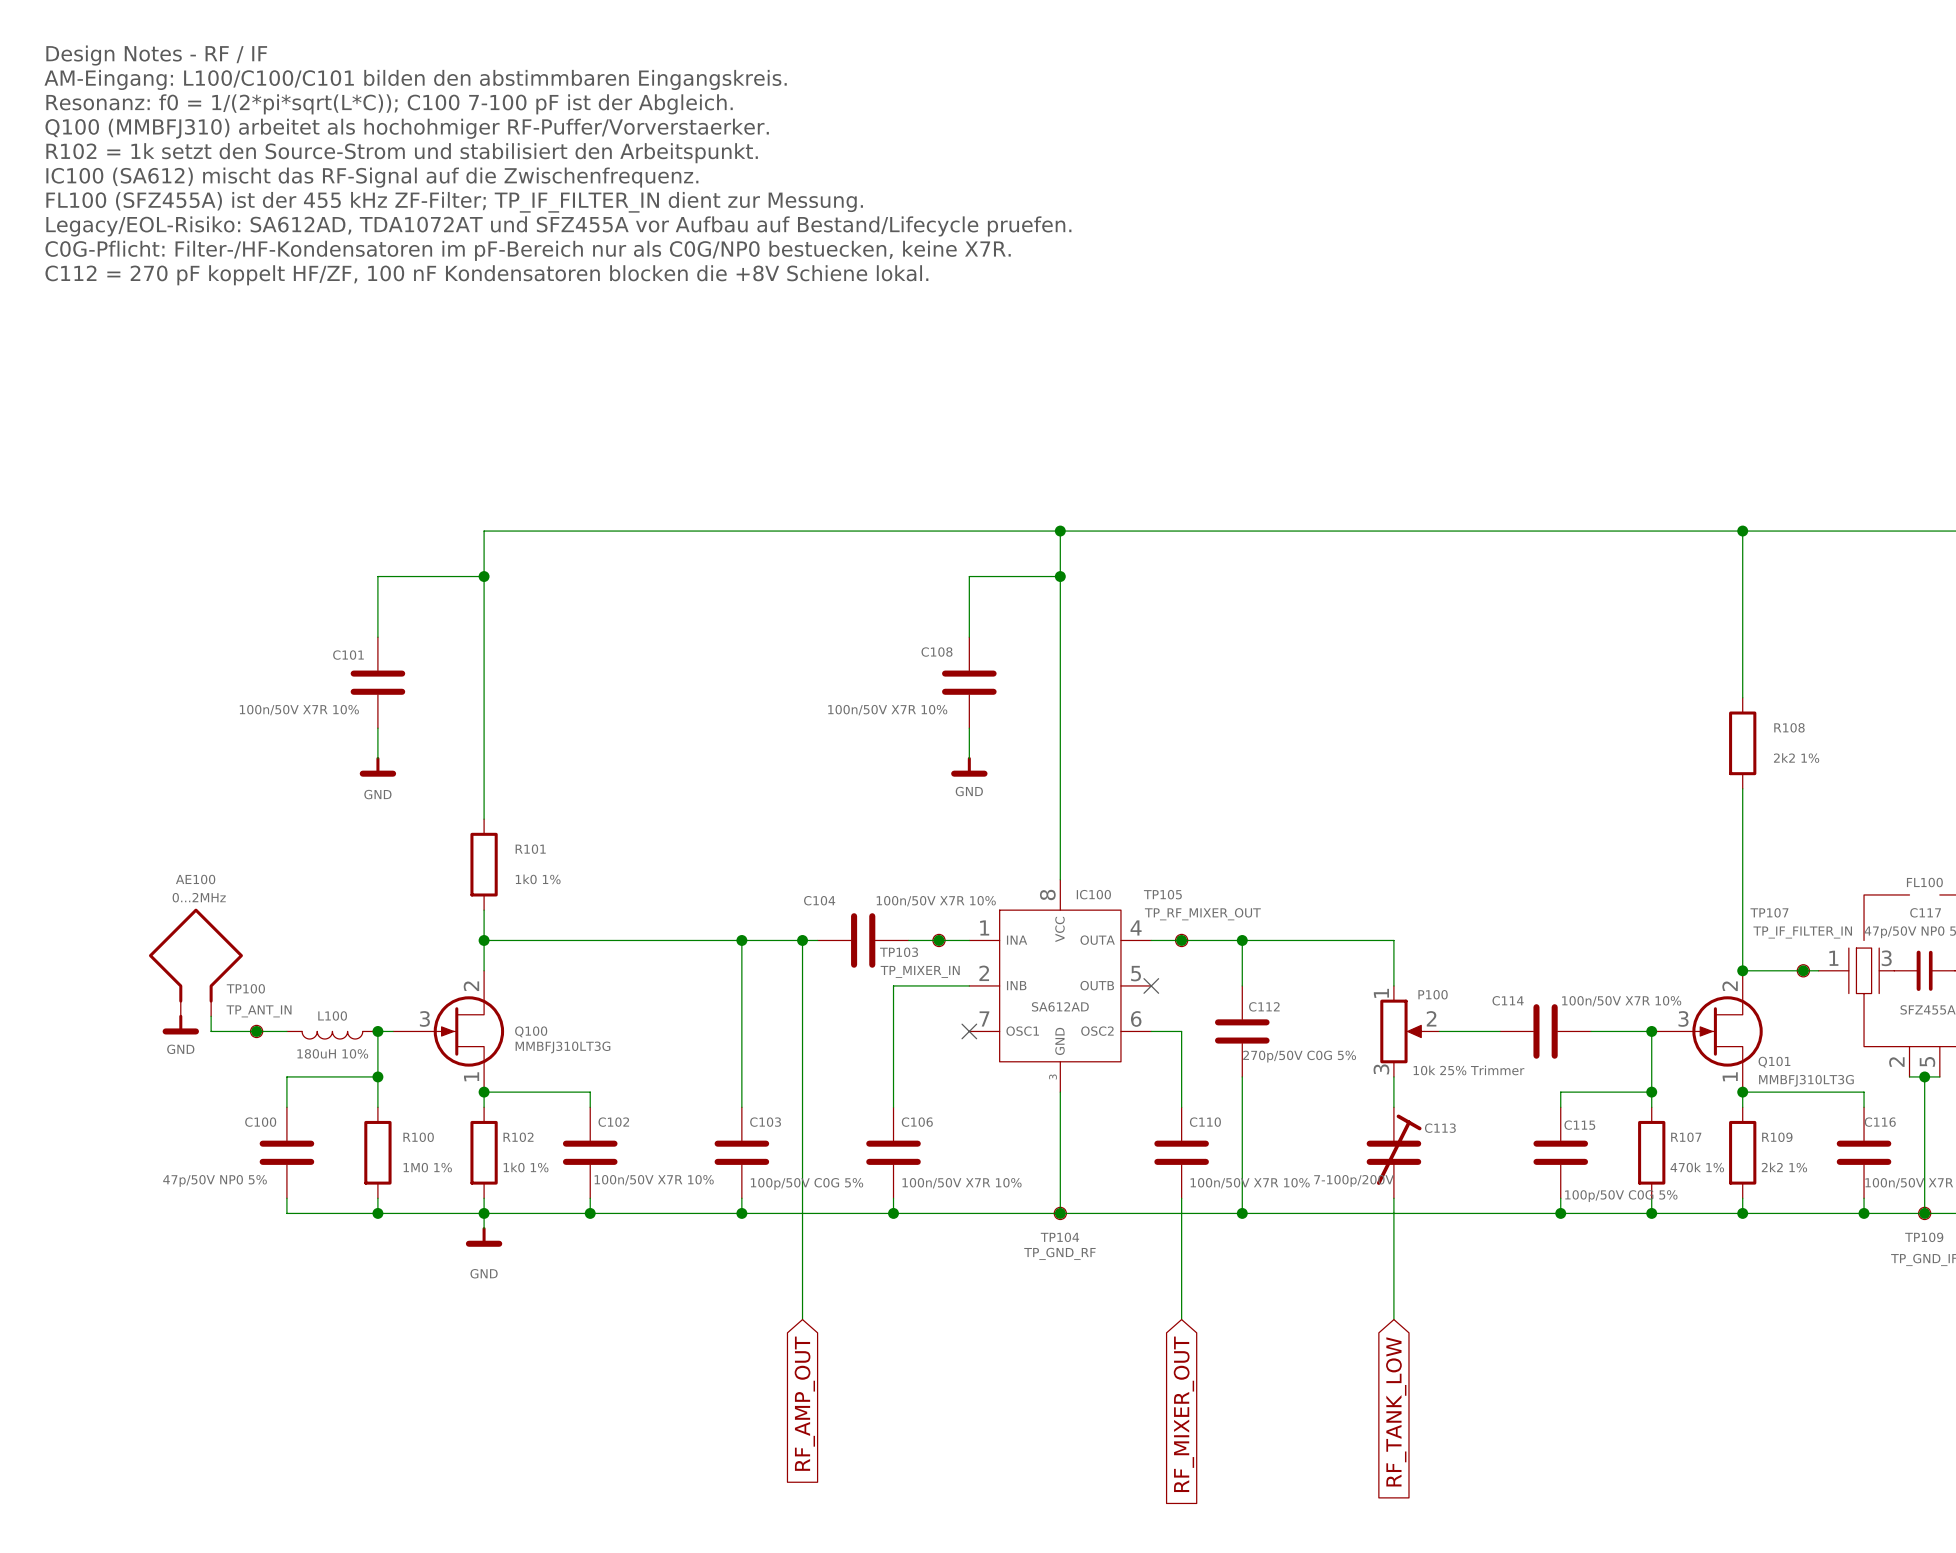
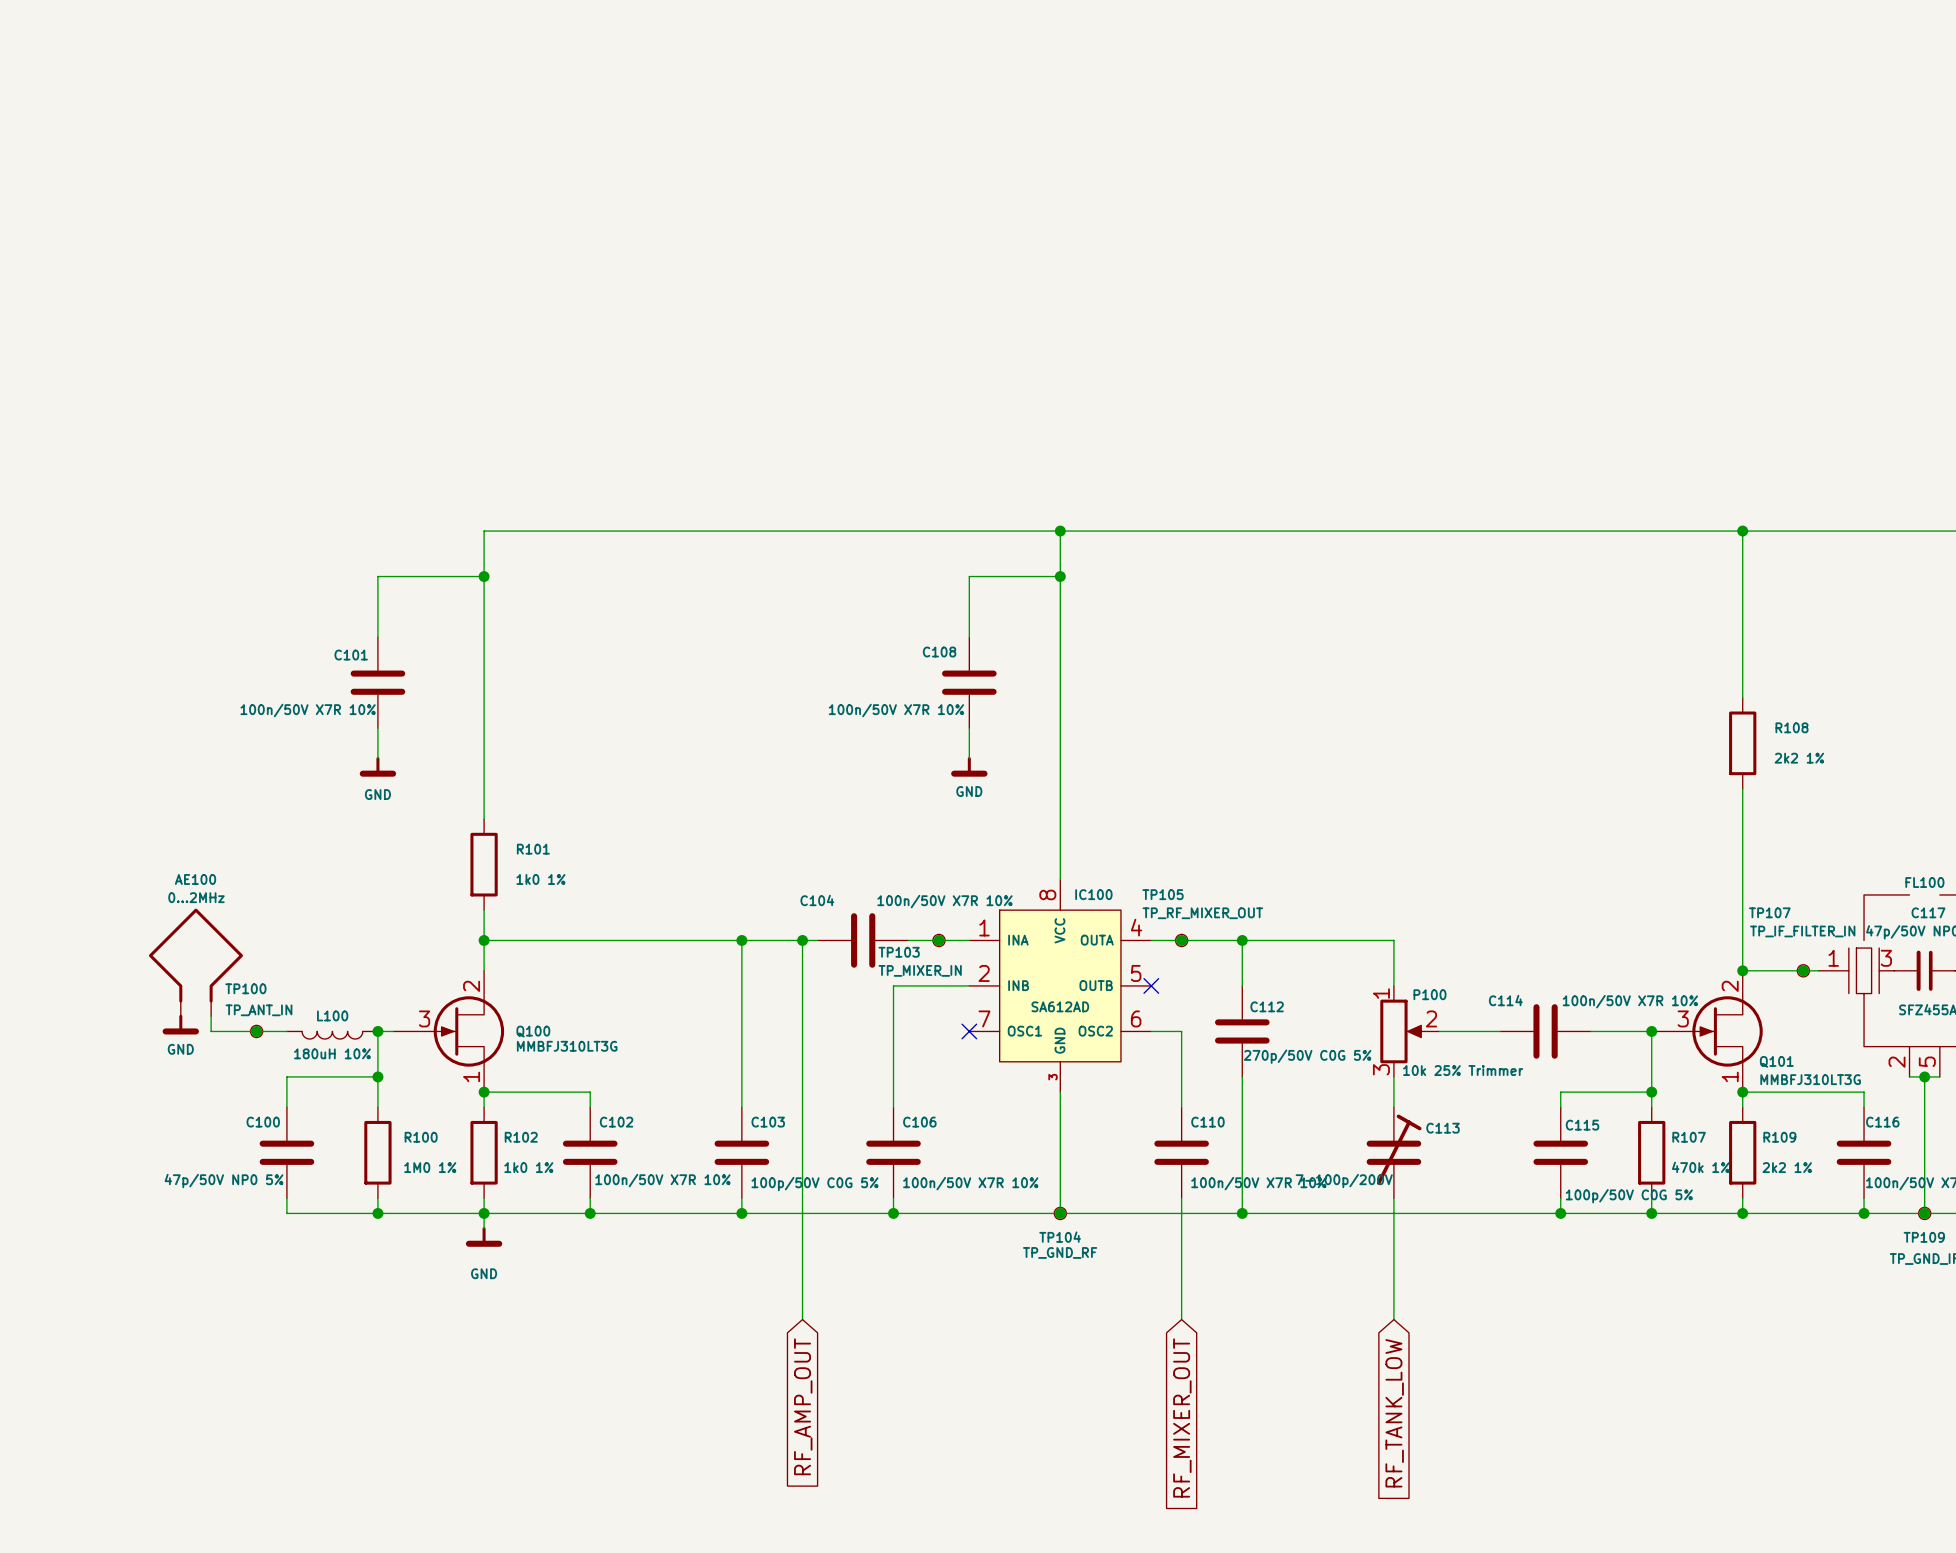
text: Design Notes - RF / IF (156, 55) -> none
text: AM-Eingang: L100/C100/C101 bilden den abstimmbaren Eingangskreis. (415, 79) -> none
text: Resonanz: f0 = 1/(2*pi*sqrt(L*C)); C100 7-100 pF ist der Abgleich. (389, 104) -> none
text: Q100 (MMBFJ310) arbeitet als hochohmiger RF-Puffer/Vorverstaerker. (407, 128) -> none
text: R102 = 1k setzt den Source-Strom und stabilisiert den Arbeitspunkt. (402, 153) -> none
text: IC100 (SA612) mischt das RF-Signal auf die Zwischenfrequenz. (372, 177) -> none
text: FL100 (SFZ455A) ist der 455 kHz ZF-Filter; TP_IF_FILTER_IN dient zur Messung. (454, 202) -> none
text: Legacy/EOL-Risiko: SA612AD, TDA1072AT und SFZ455A vor Aufbau auf Bestand/Lifecycle pruefen. (558, 226) -> none
text: C0G-Pflicht: Filter-/HF-Kondensatoren im pF-Bereich nur als C0G/NP0 bestuecken, keine X7R. (528, 250) -> none
text: C112 = 270 pF koppelt HF/ZF, 100 nF Kondensatoren blocken die +8V Schiene lokal. (486, 275) -> none

